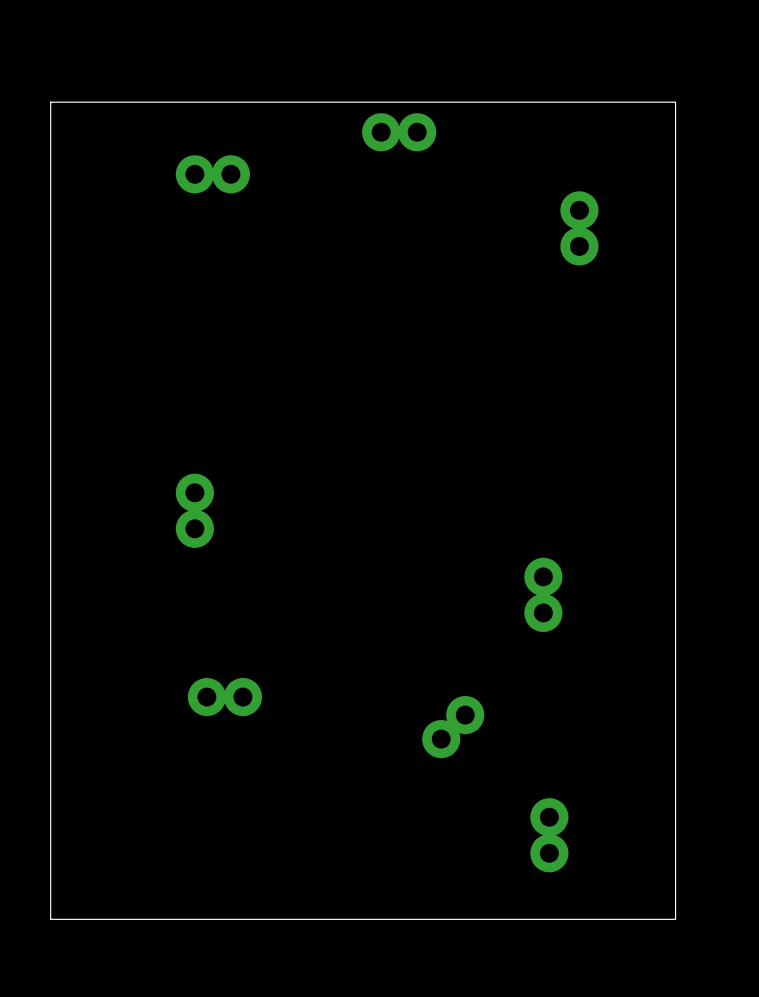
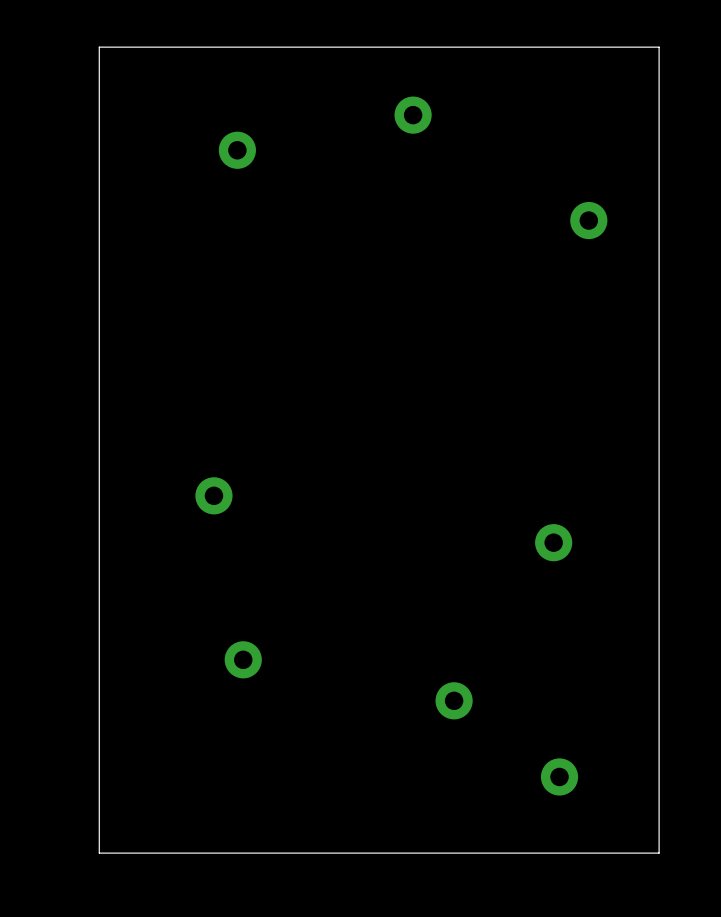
board edge: (675, 102) (50, 102) (50, 919) (675, 919) (675, 102) -> (659, 47) (659, 853) (99, 853) (99, 47) (659, 47)
part: (381, 132) -> none
part: (417, 132) -> none
part: none -> (413, 115)
part: (194, 174) -> none
part: none -> (237, 150)
part: (230, 174) -> none
part: (579, 210) -> none
part: (194, 492) -> none
part: (543, 612) -> none
part: (206, 697) -> none
part: none -> (243, 659)
part: (242, 697) -> none
part: (465, 715) -> none
part: (549, 853) -> none

